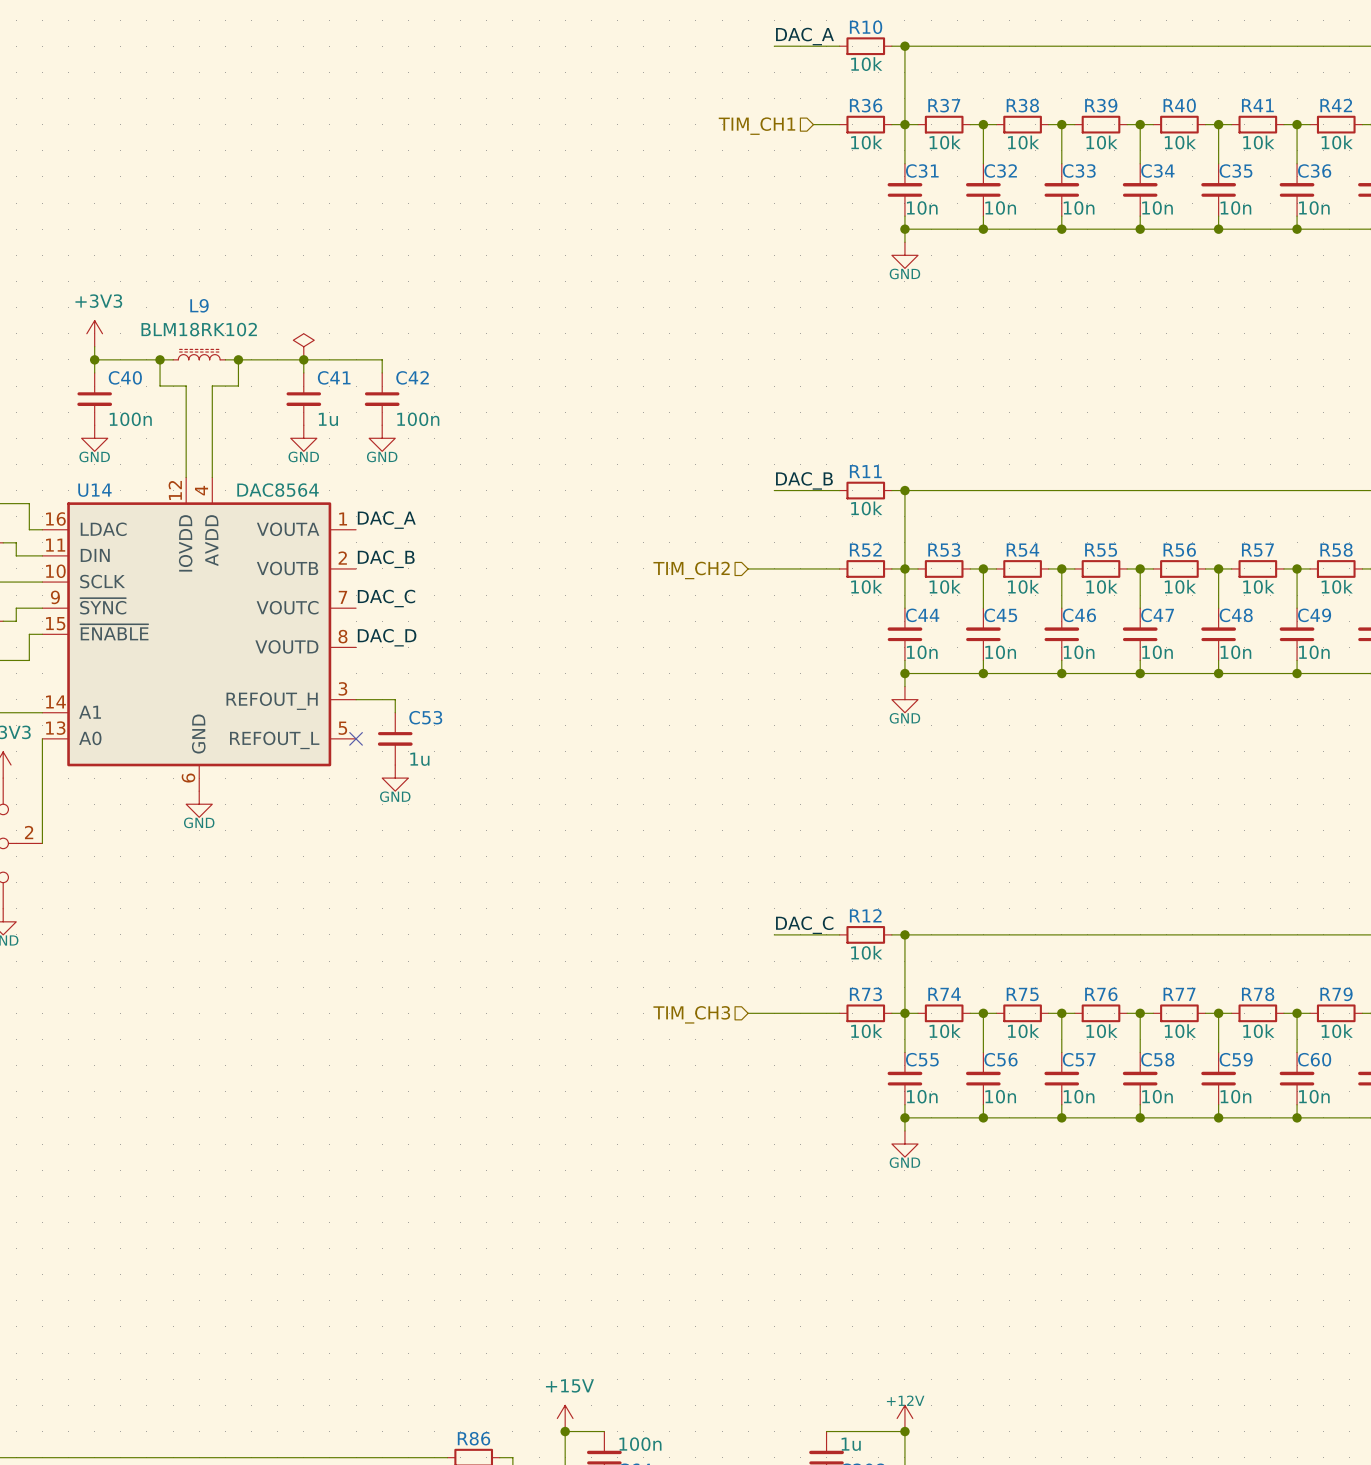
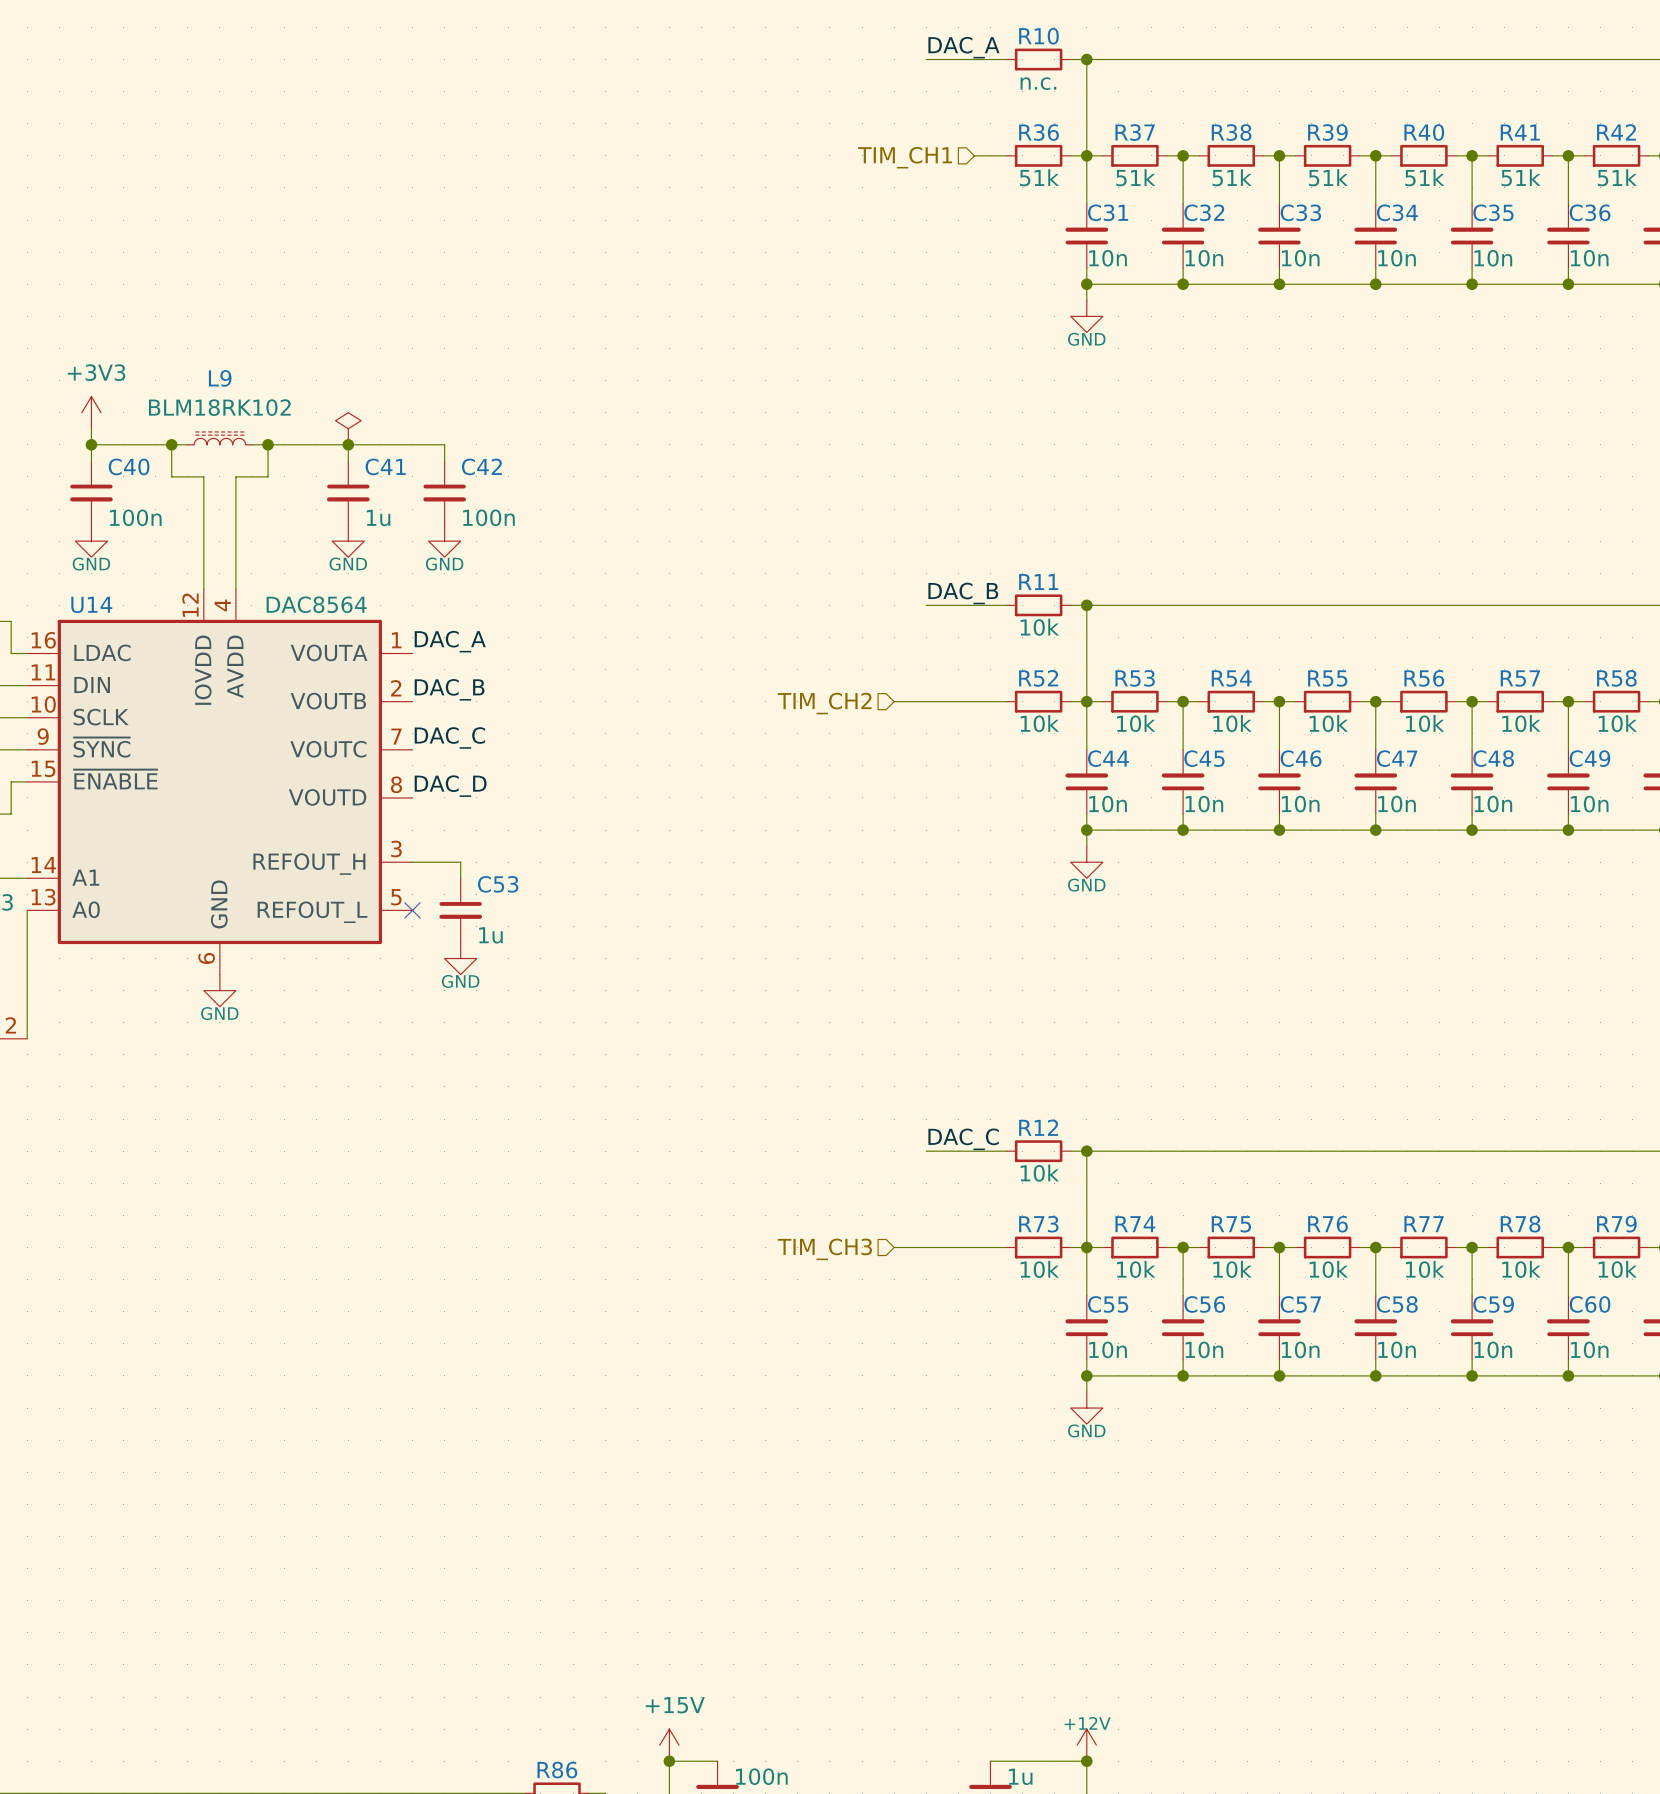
R10 value: 10k (866, 64) -> n.c. (1038, 83)
R36 value: 10k (866, 142) -> 51k (1039, 177)
R37 value: 10k (945, 142) -> 51k (1135, 177)
R38 value: 10k (1023, 142) -> 51k (1232, 177)
R39 value: 10k (1101, 142) -> 51k (1328, 177)
R40 value: 10k (1180, 142) -> 51k (1424, 177)
R41 value: 10k (1258, 142) -> 51k (1521, 177)
R42 value: 10k (1337, 142) -> 51k (1617, 177)

